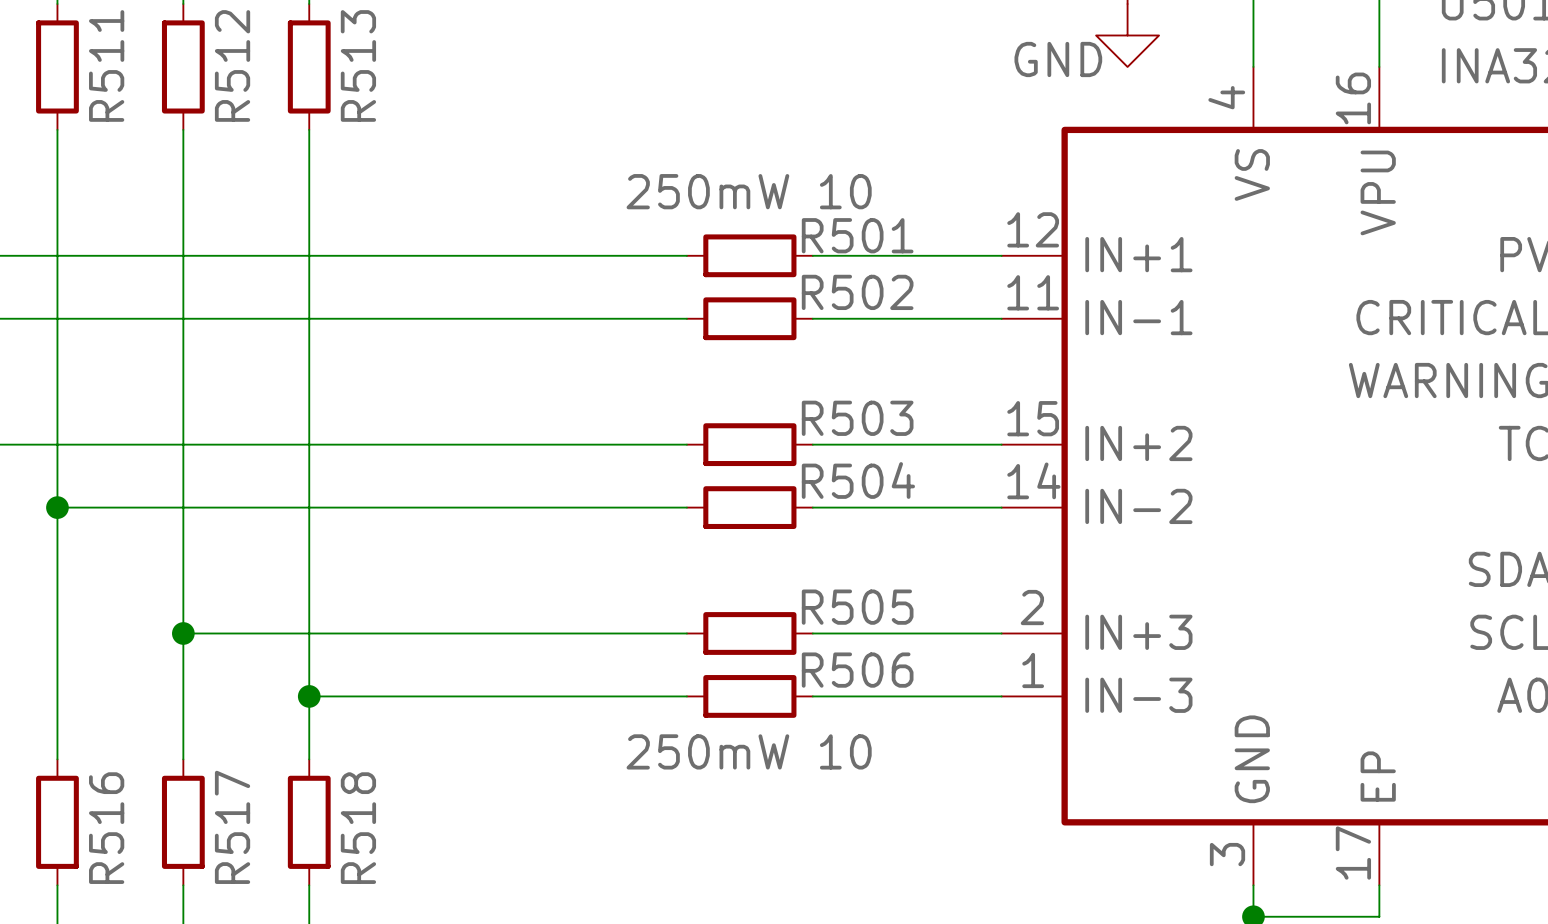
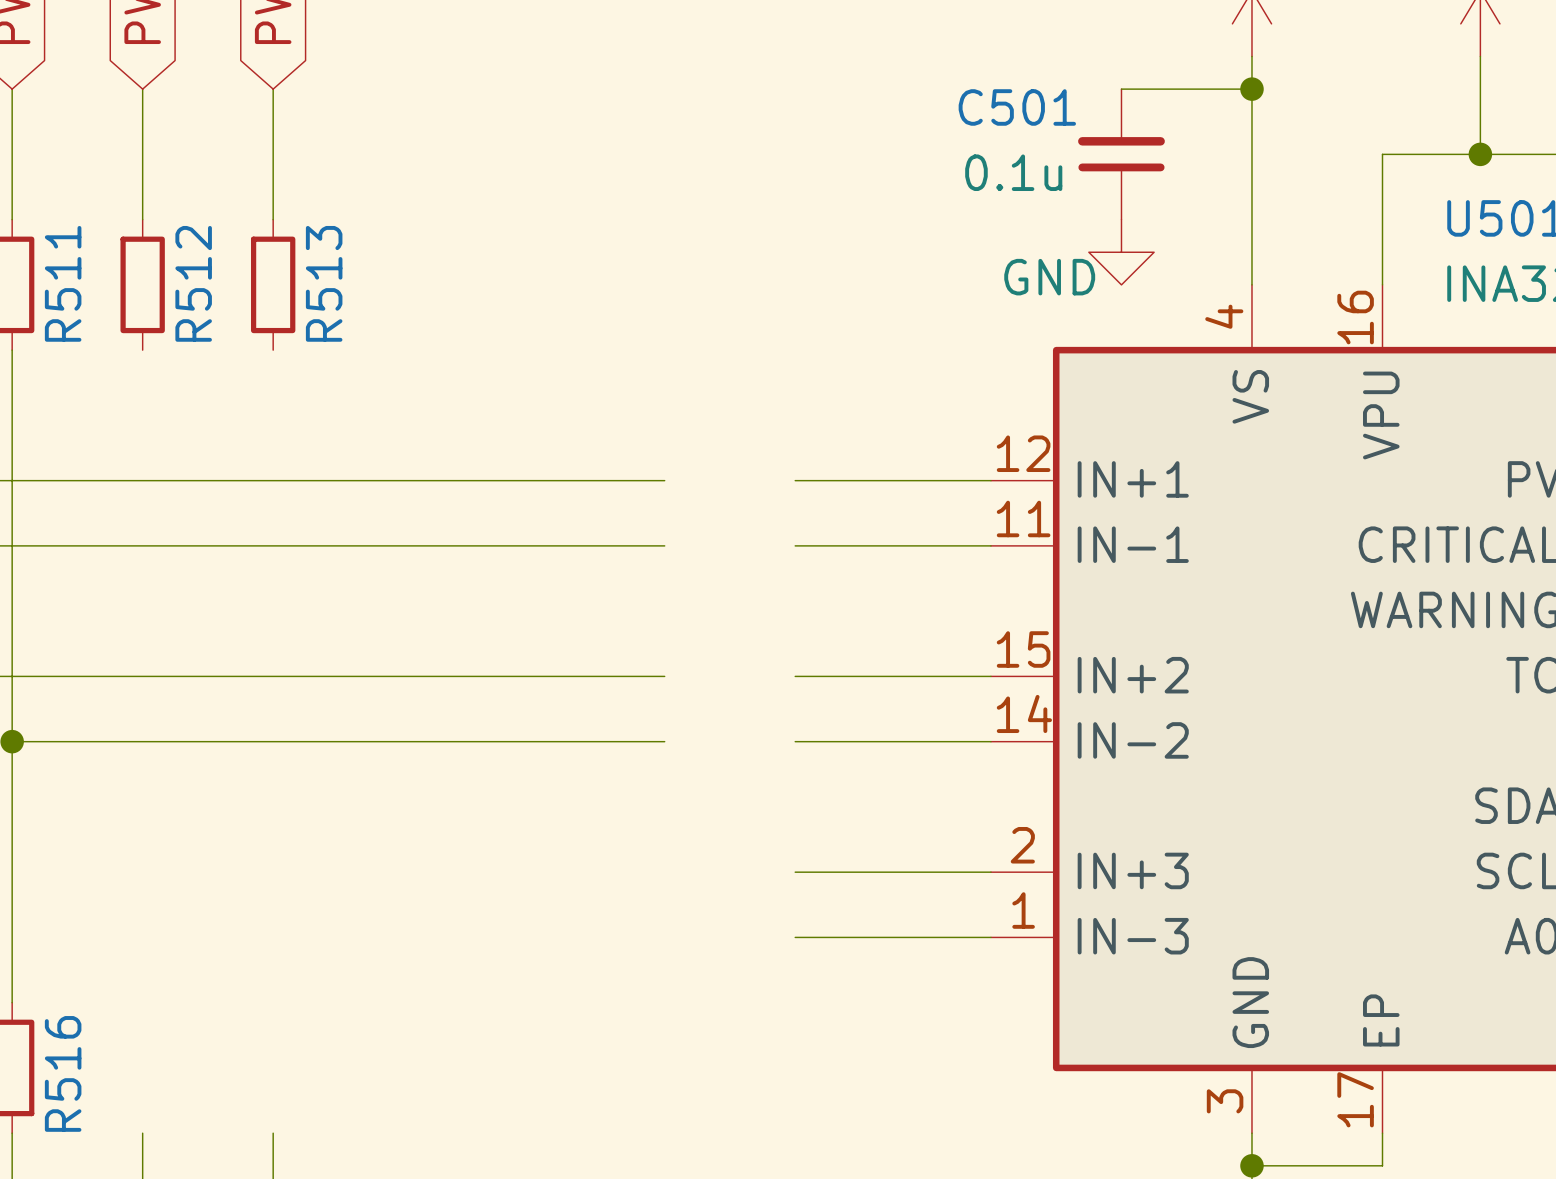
wire: (183, 129) (183, 759) -> none
wire: (309, 129) (309, 759) -> none
R501: 250mW 10 (749, 255) -> none
R502: (749, 318) -> none
R503: (749, 444) -> none
R504: (749, 507) -> none
wire: (183, 633) (686, 633) -> none
junction: (183, 633) -> none
R505: (749, 633) -> none
wire: (309, 696) (686, 696) -> none
junction: (309, 696) -> none
R506: 250mW 10 (749, 696) -> none
R517: (183, 822) -> none
R518: (309, 822) -> none

